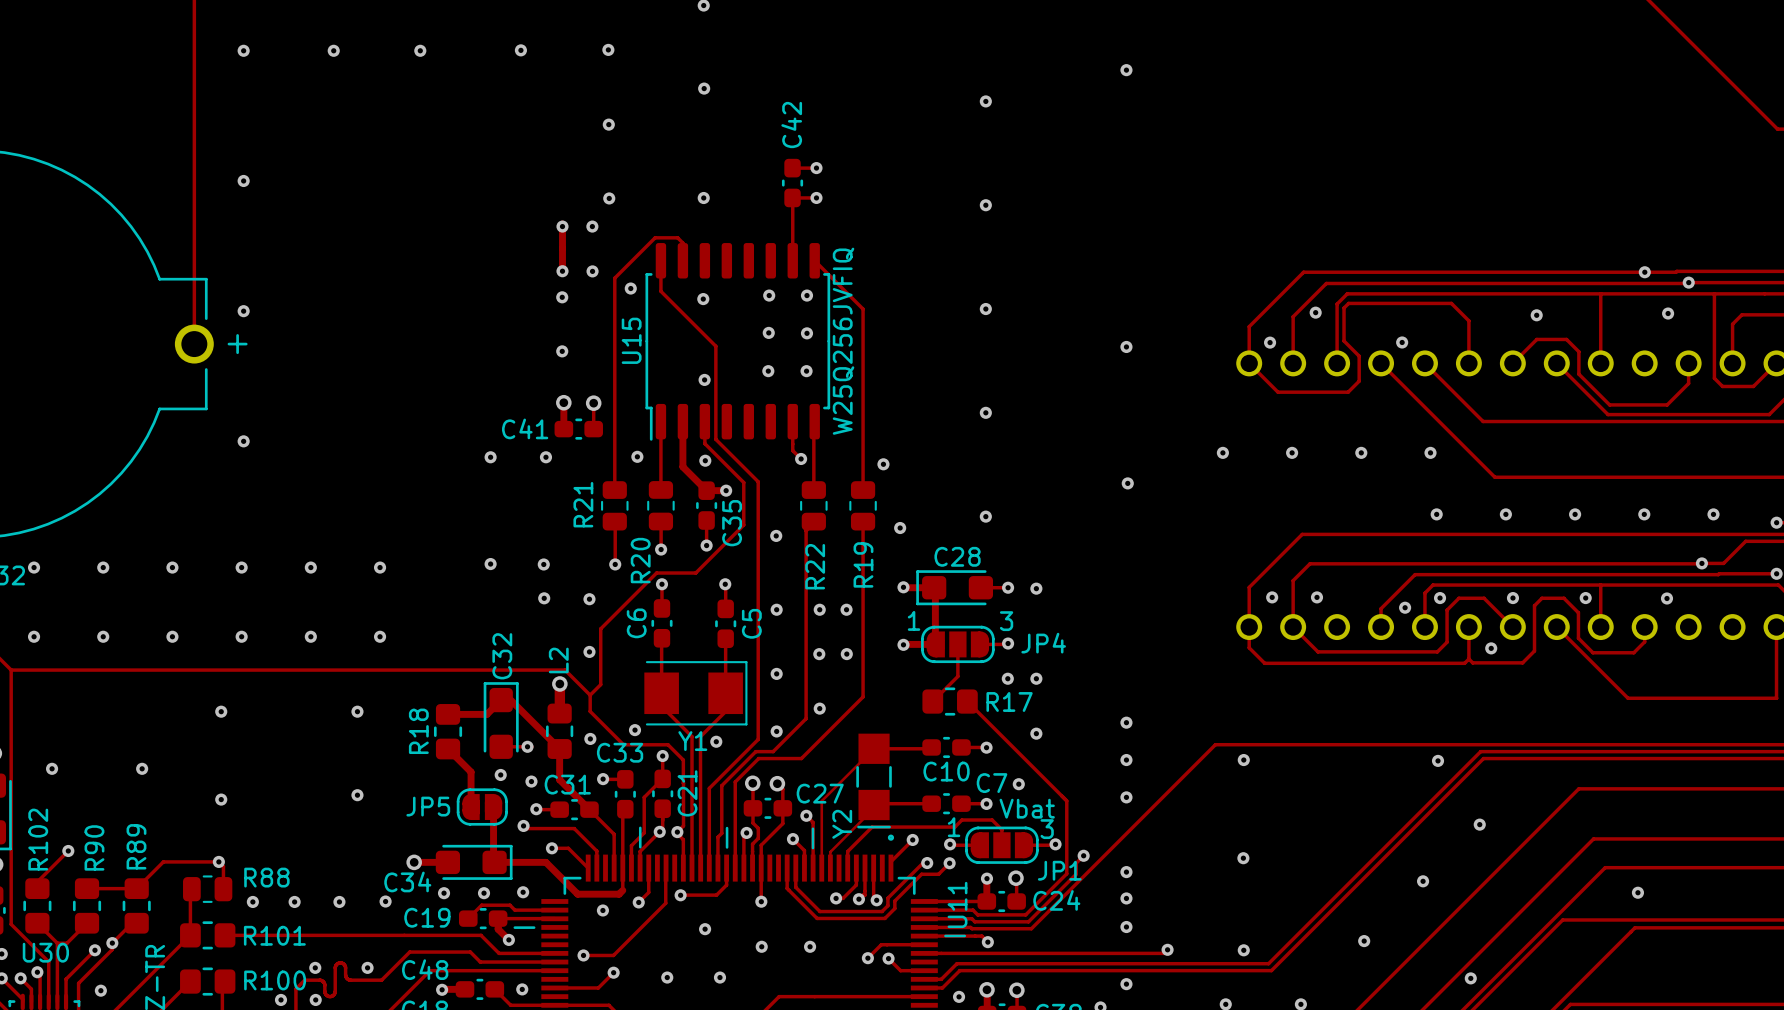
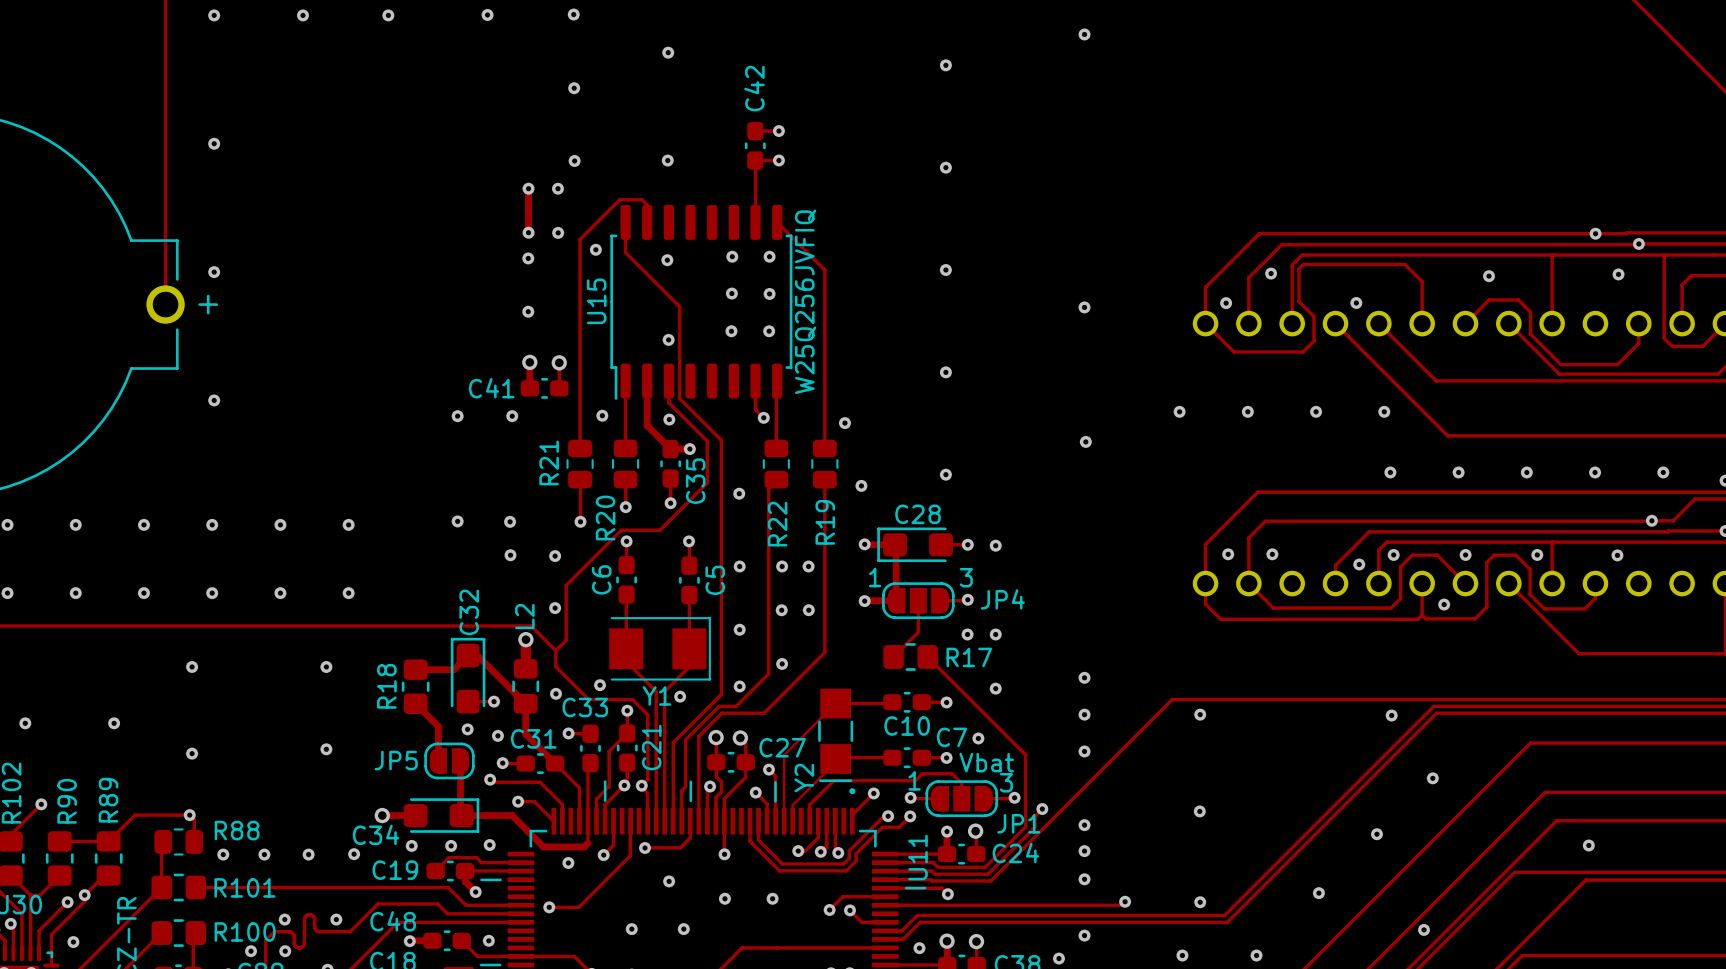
track: (613, 972) (598, 987) (554, 987) -> none
via: (613, 972) -> none

